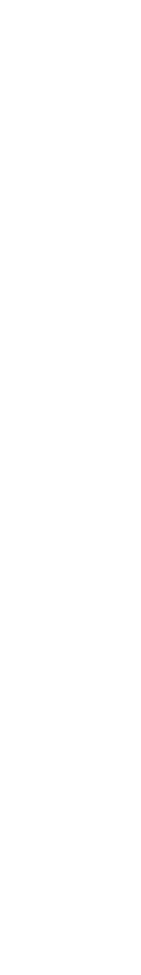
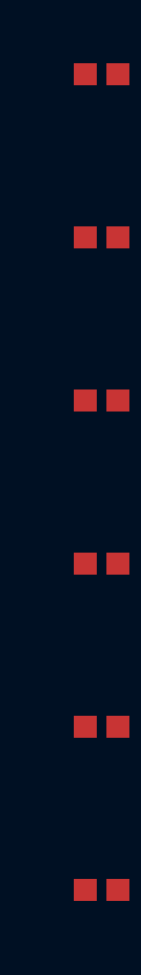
part: none -> (101, 74)
part: none -> (101, 237)
part: none -> (101, 400)
part: none -> (101, 563)
part: none -> (101, 726)
part: none -> (101, 889)

